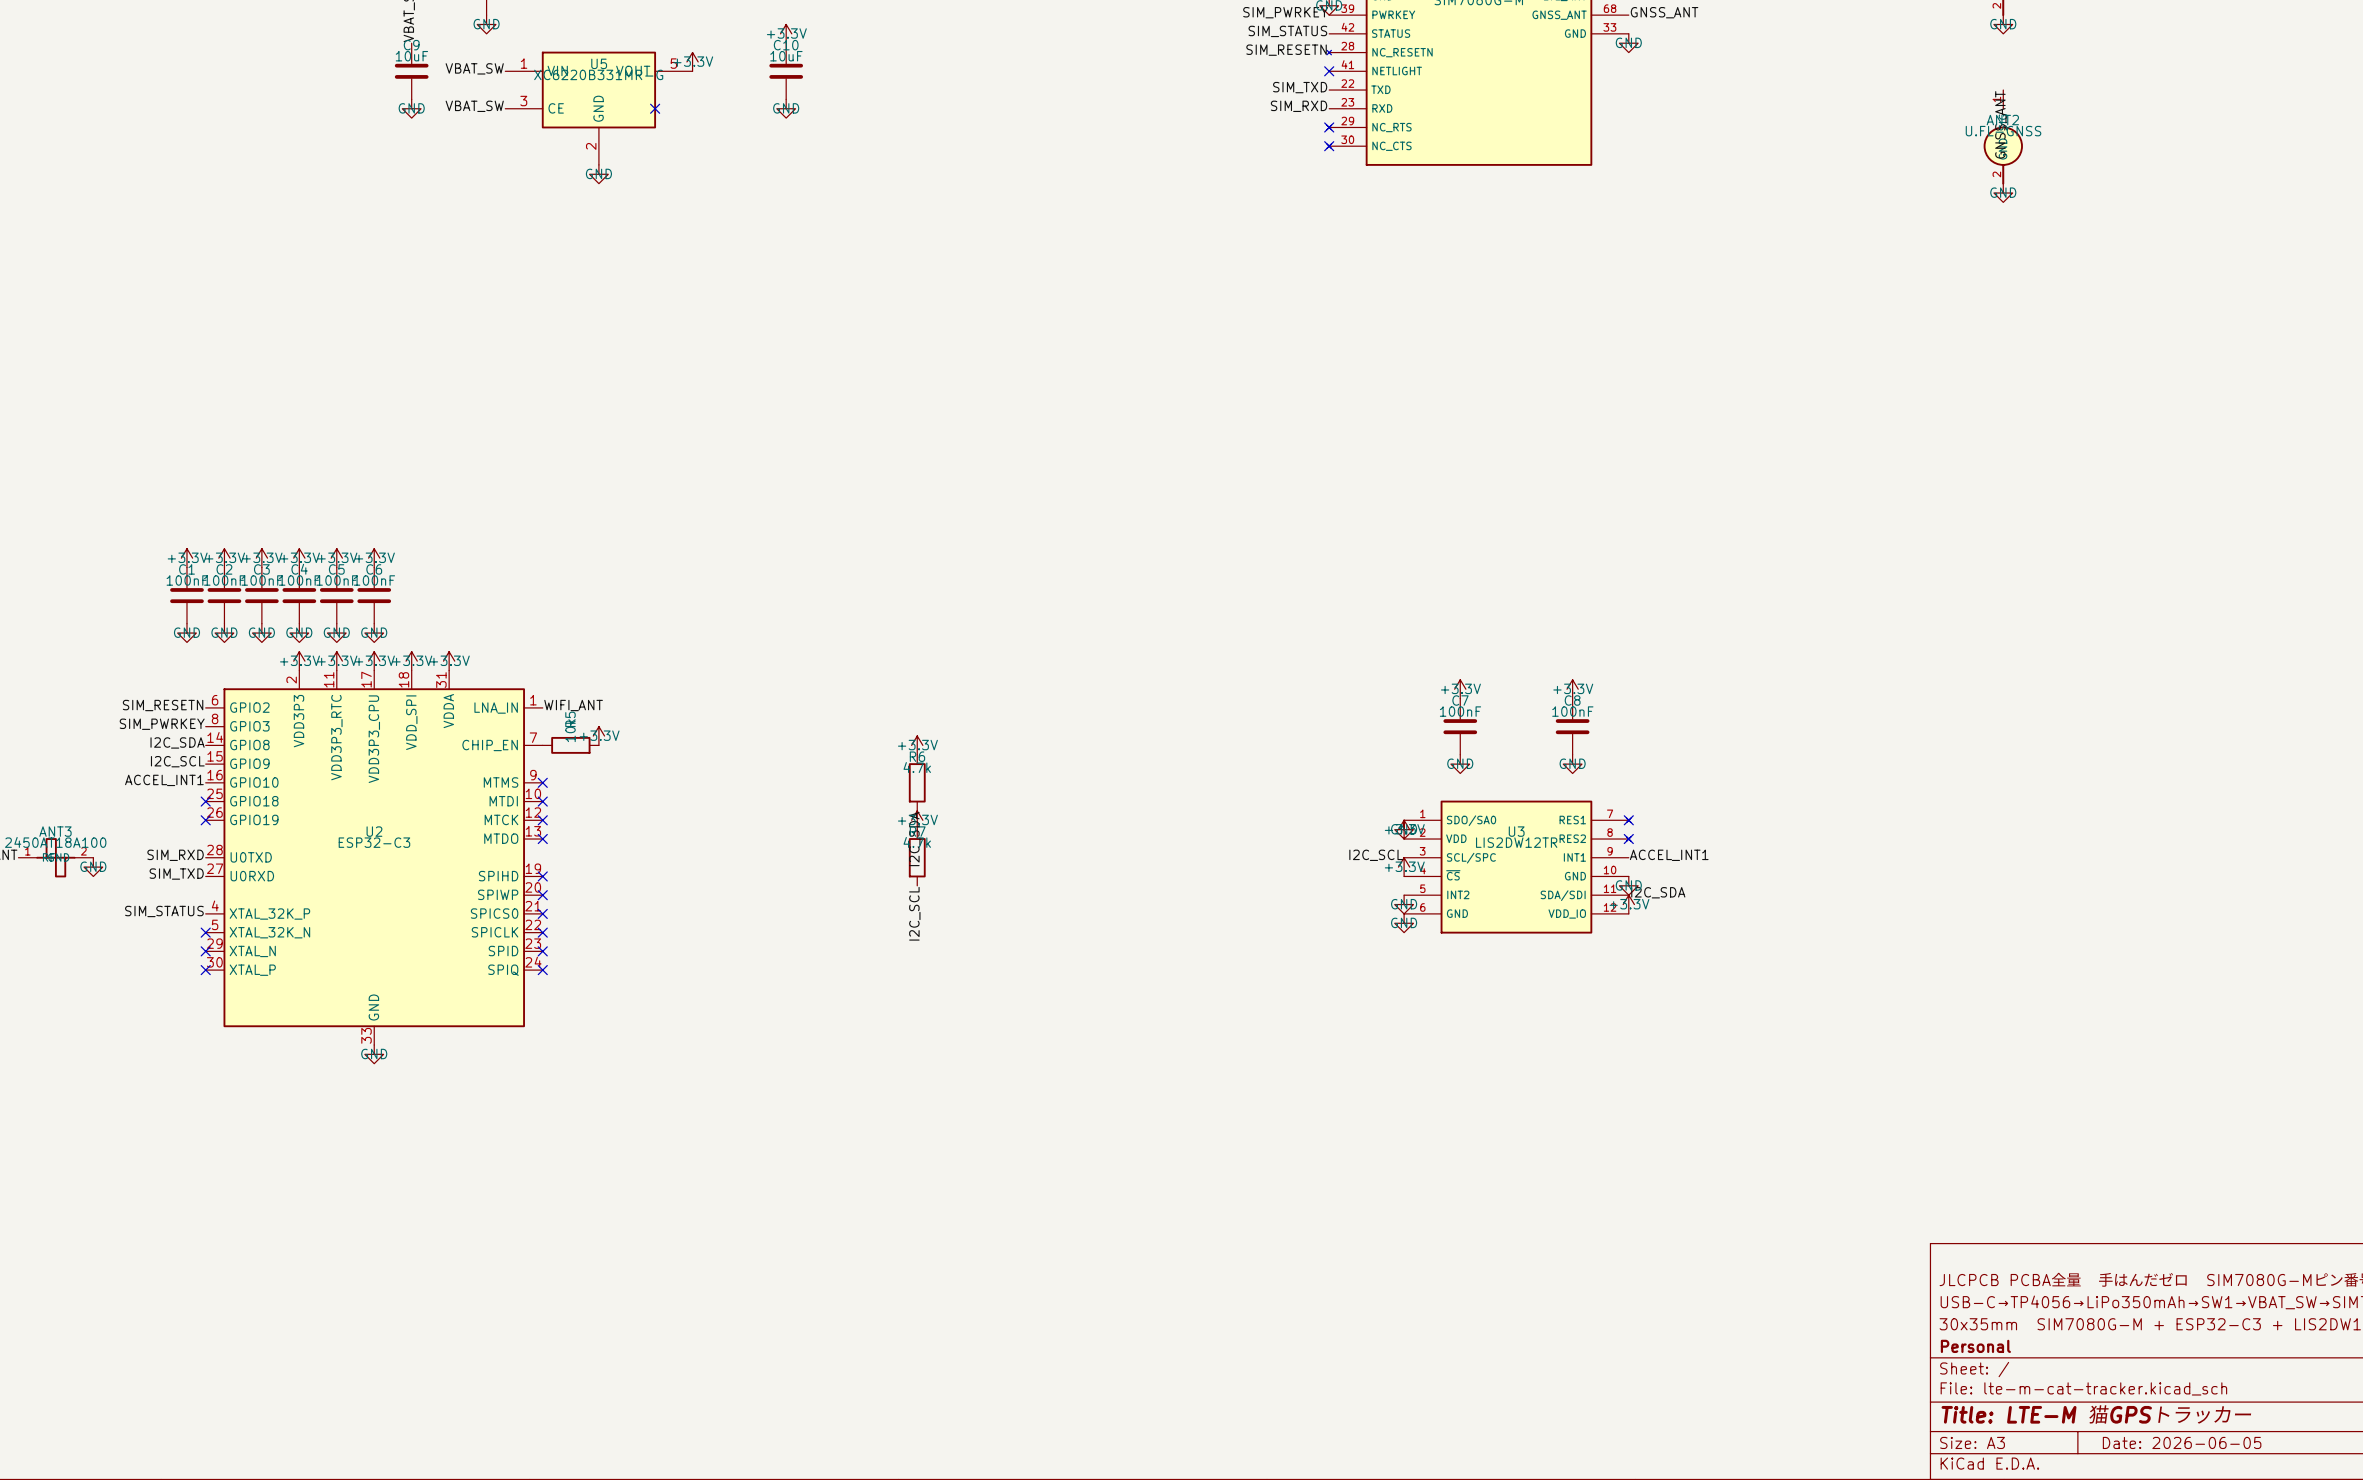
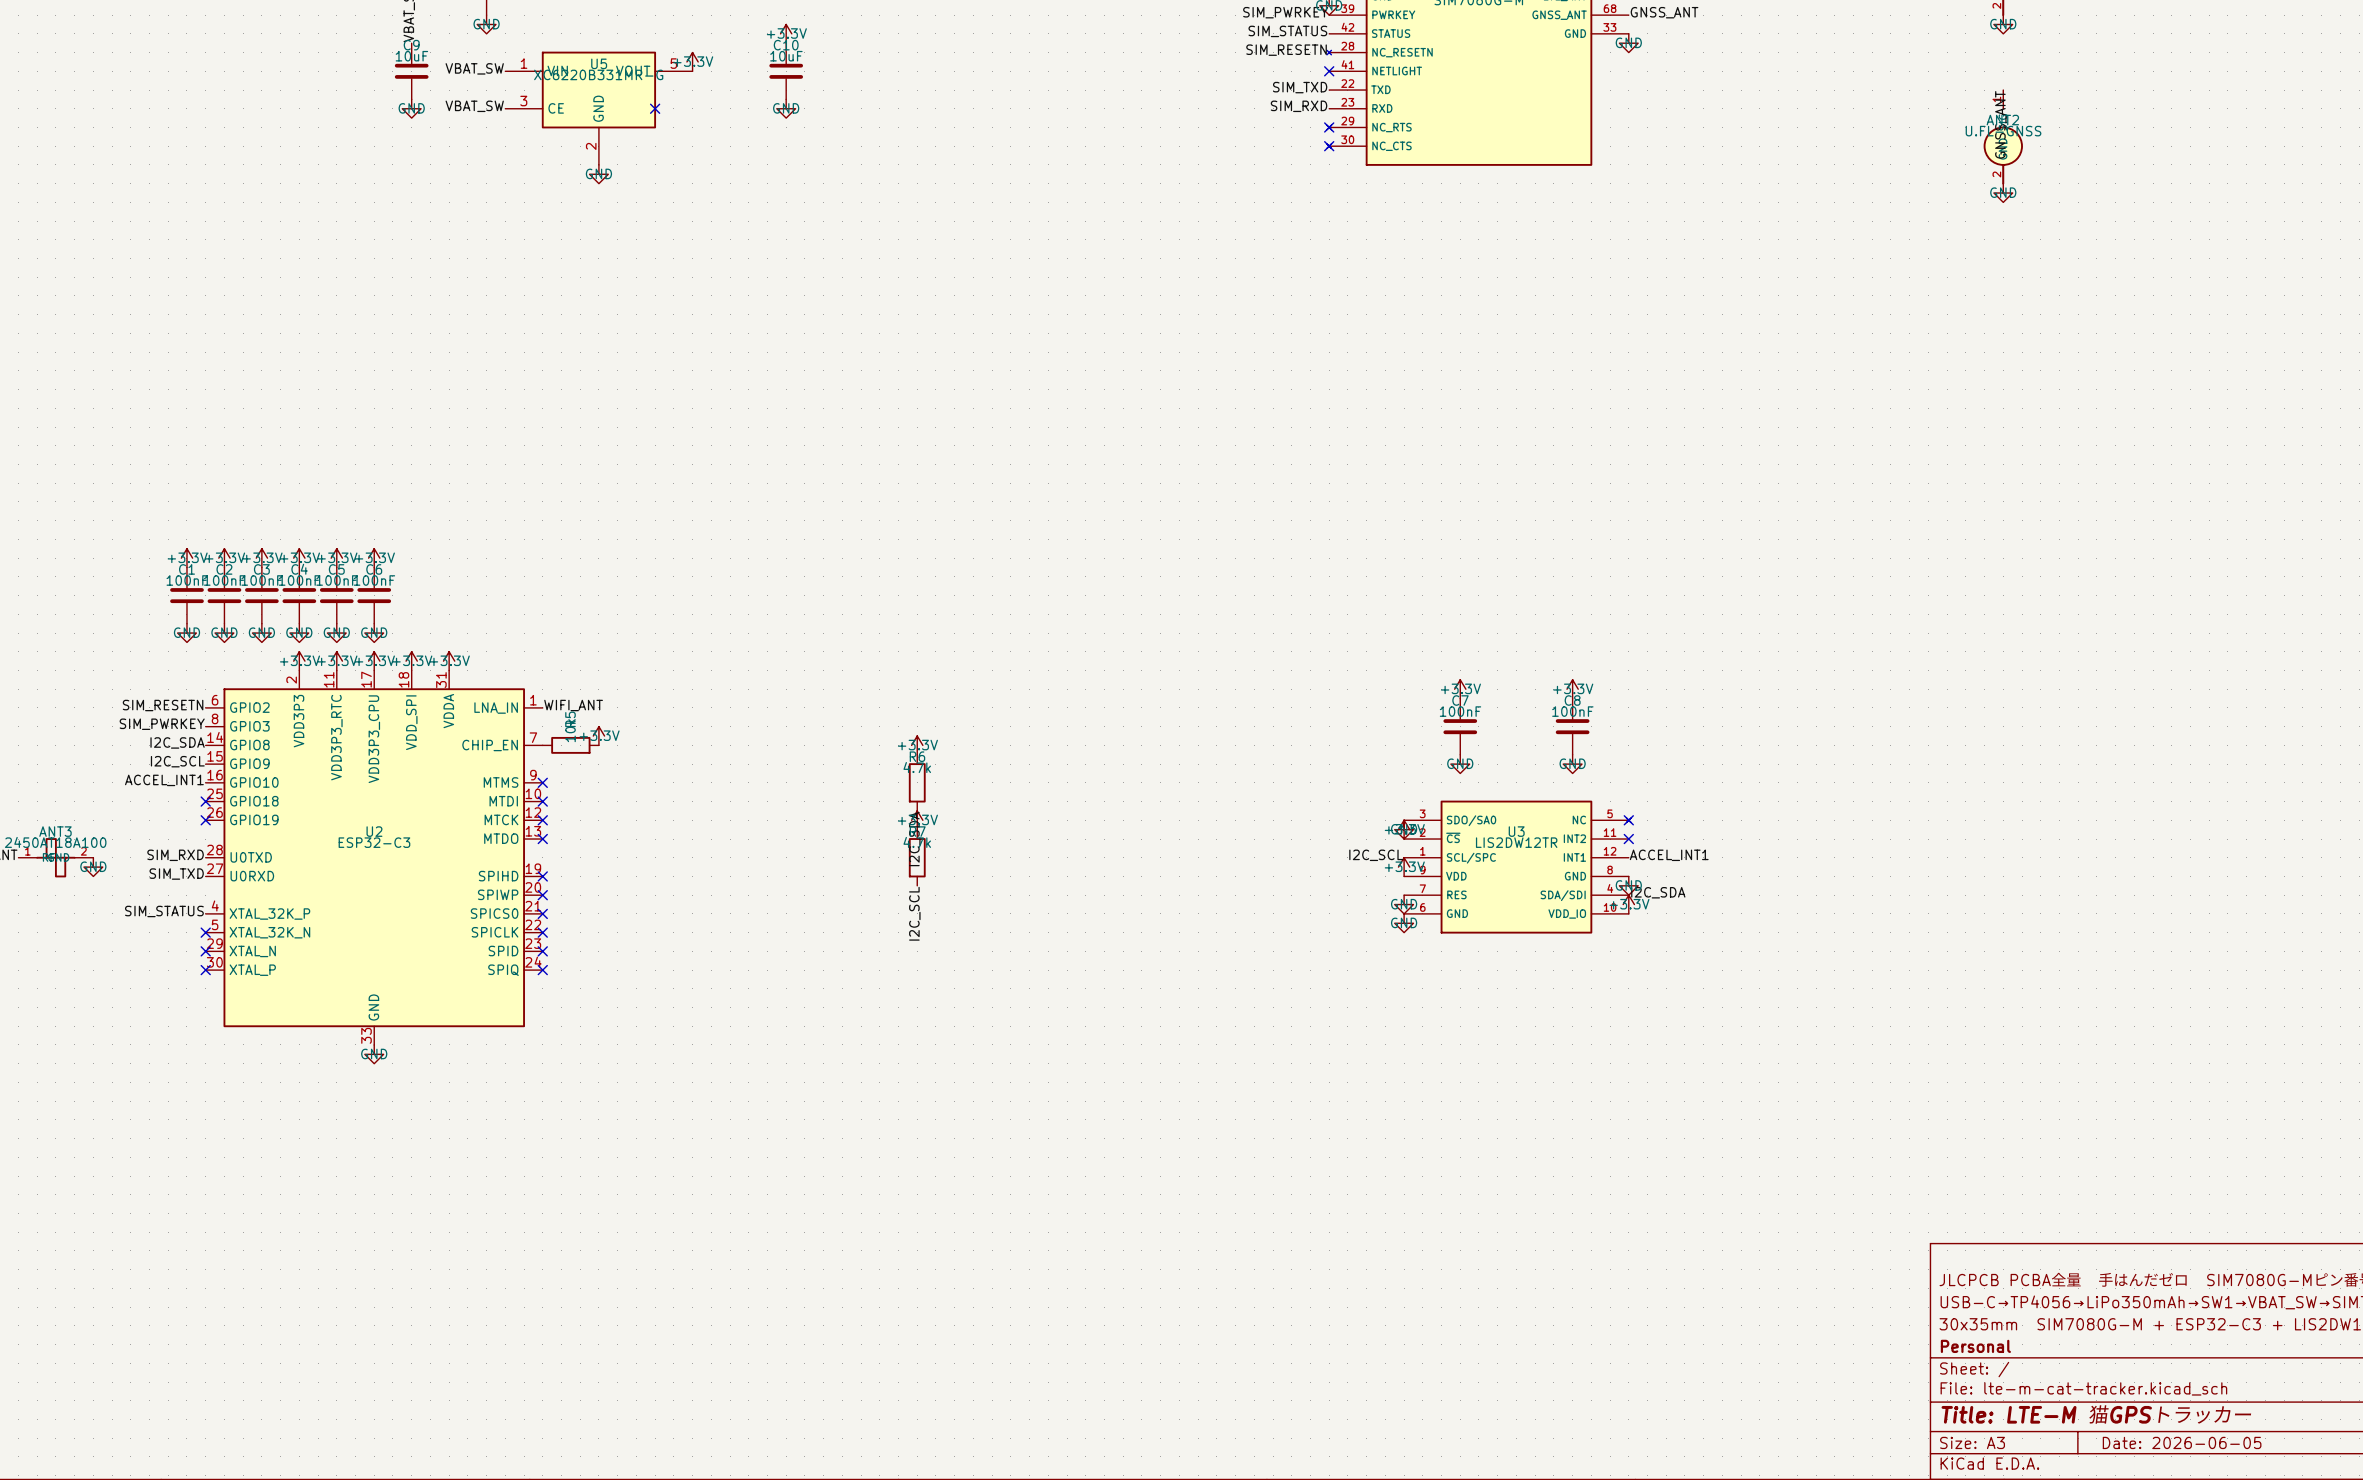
U3 symbol: [1404, 800, 1632, 934] -> [1404, 800, 1632, 934]

